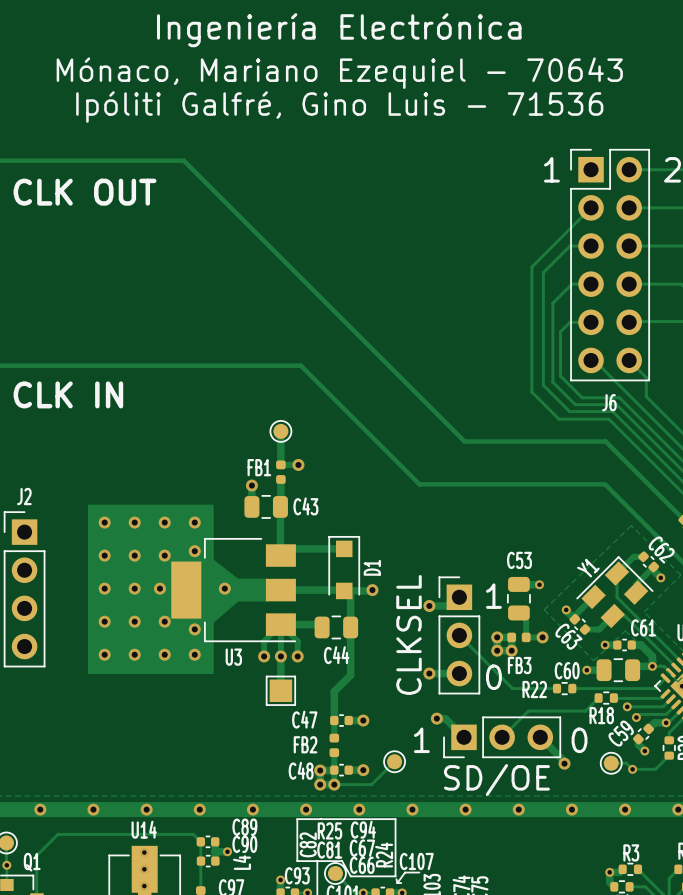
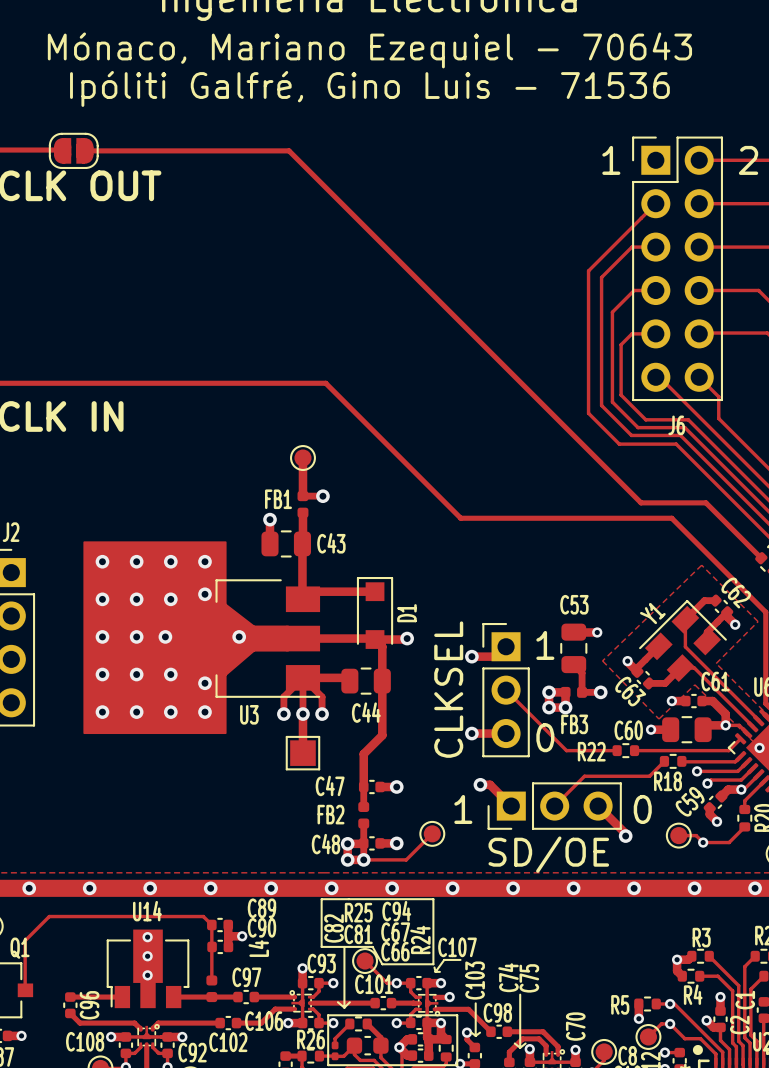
track: (68, 160) (183, 160) (464, 441) (605, 441) (635, 470) -> (84, 150) (289, 150) (641, 502) (705, 502)
part: none -> (73, 150)

